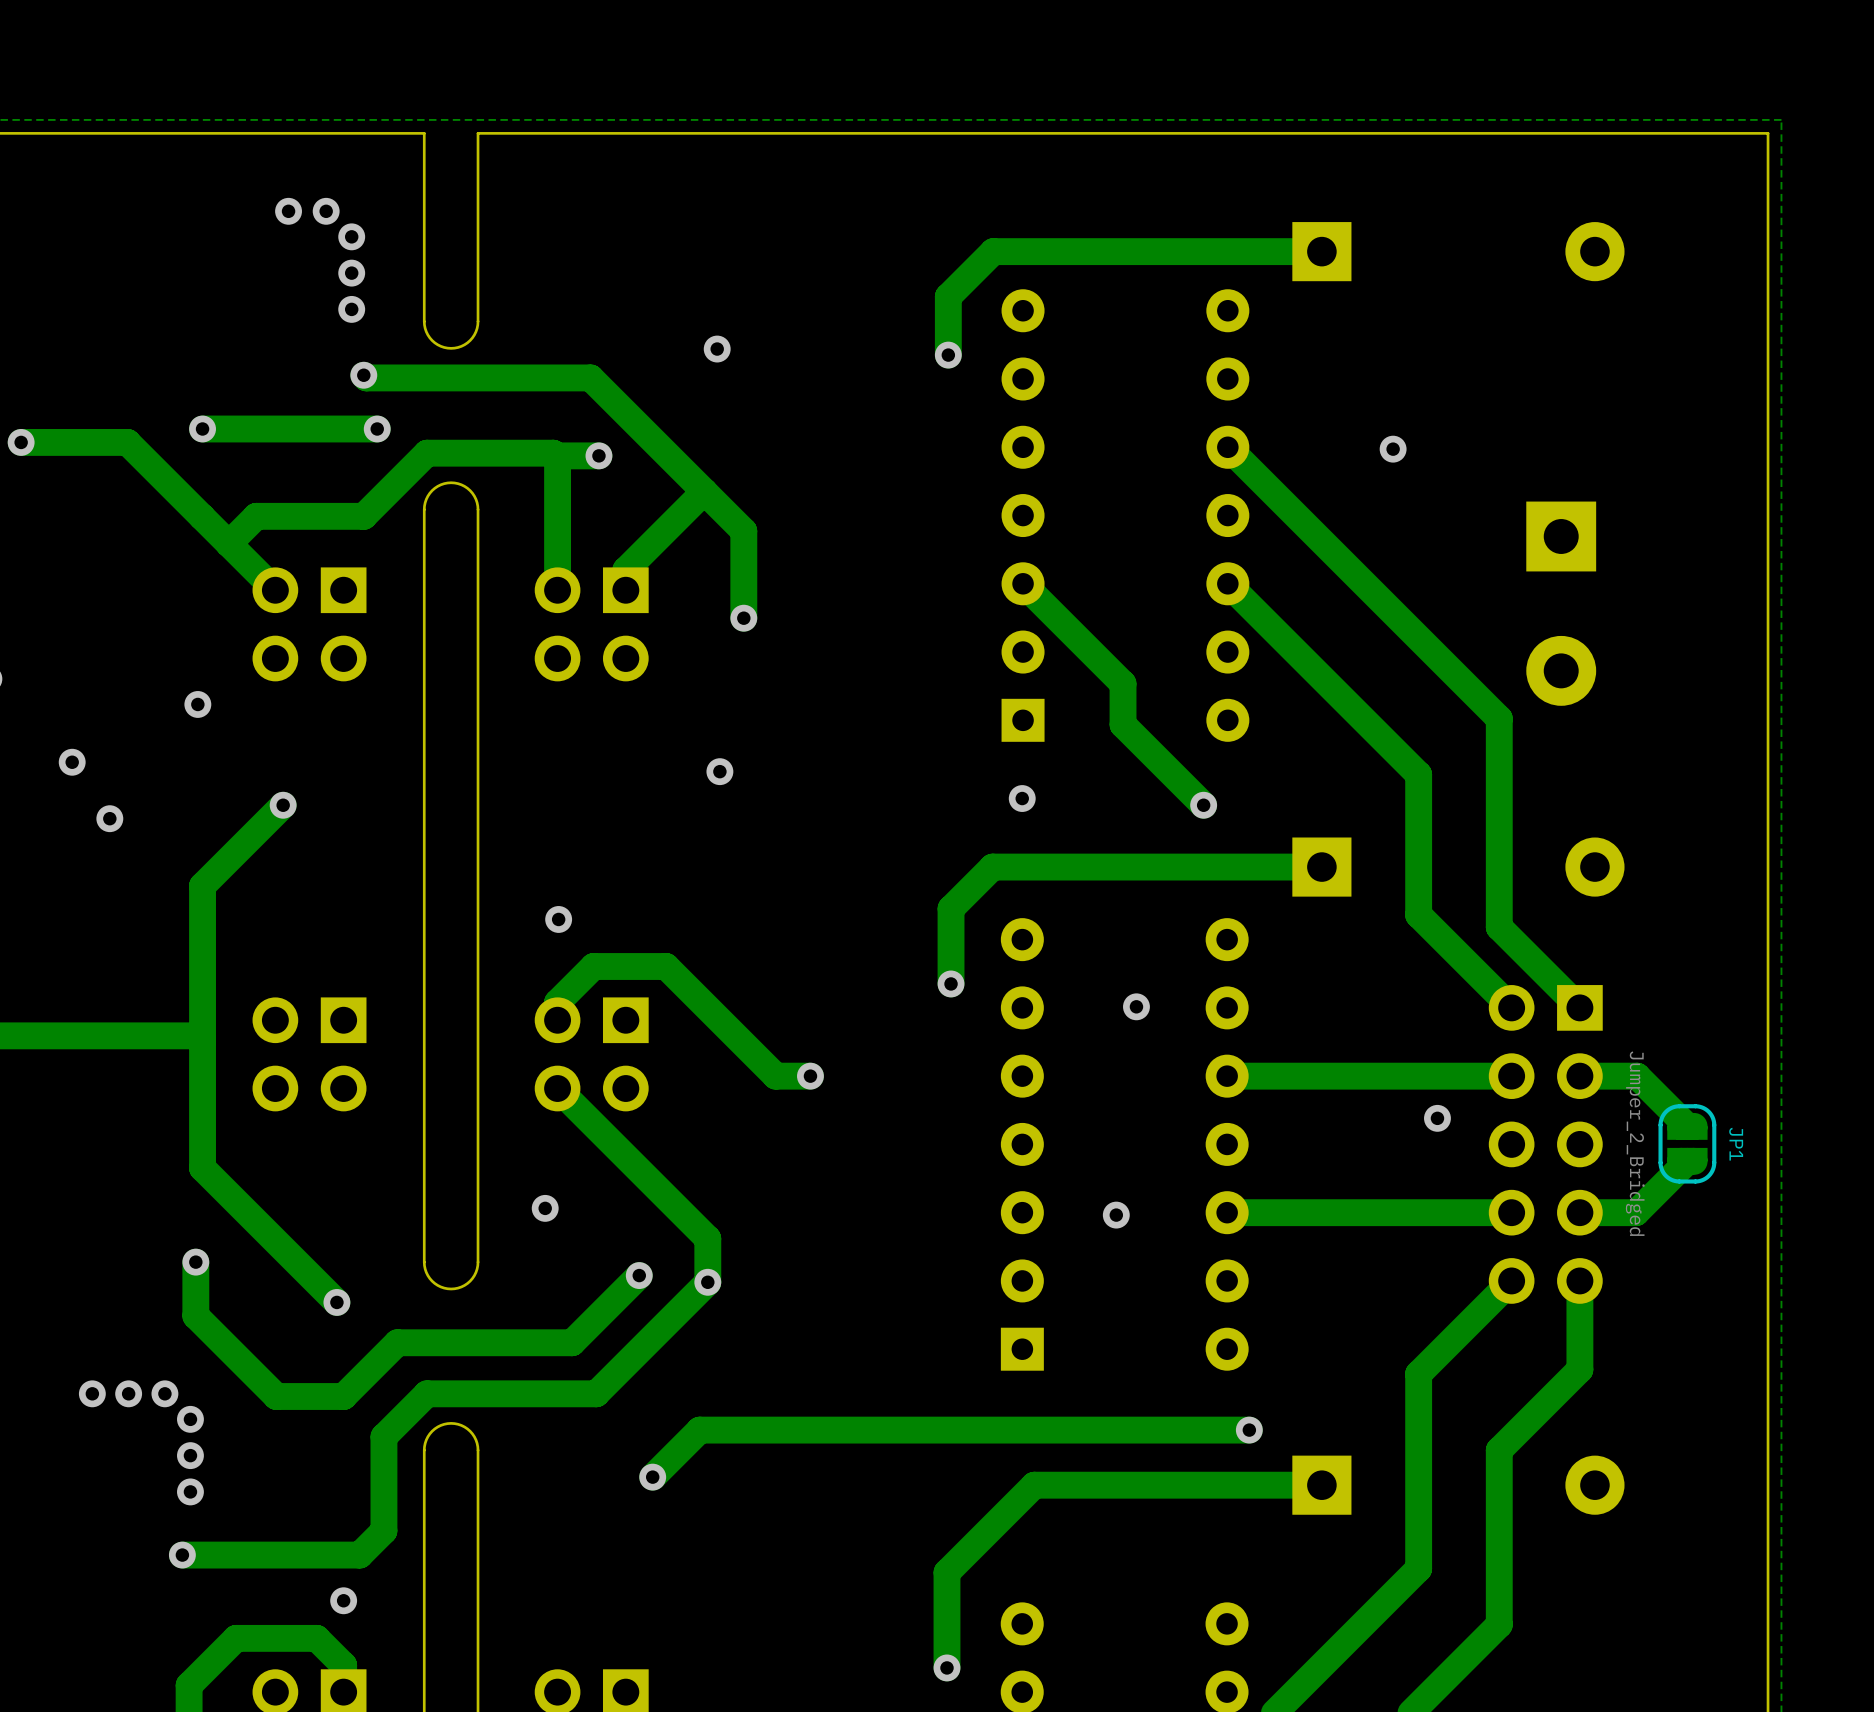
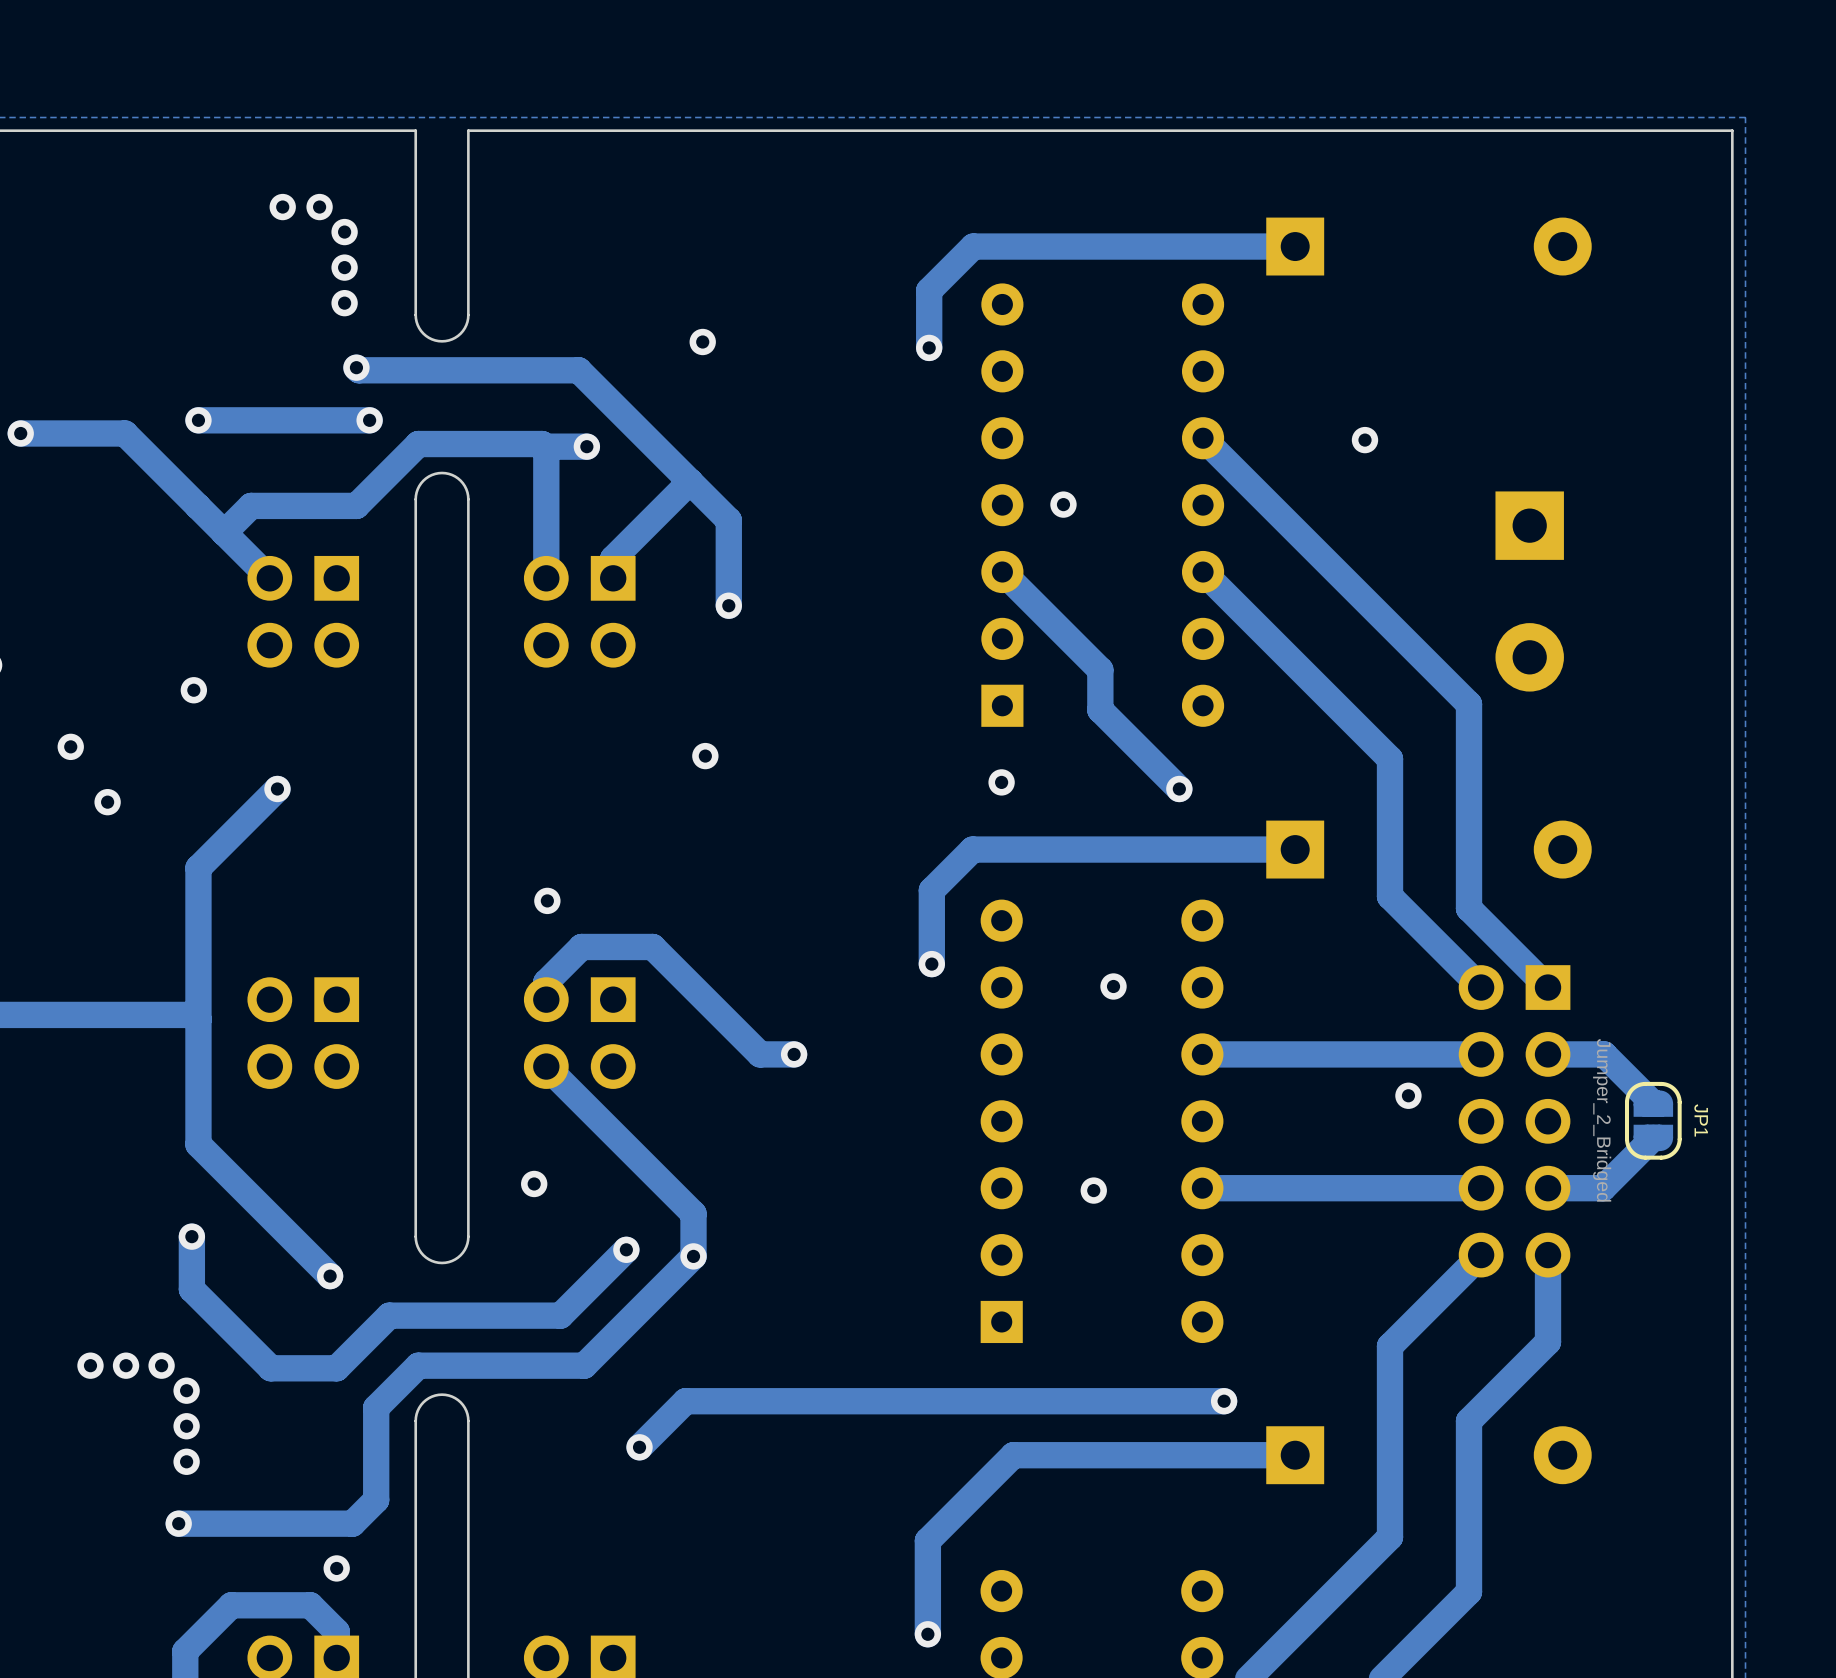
via: none -> (1063, 504)

